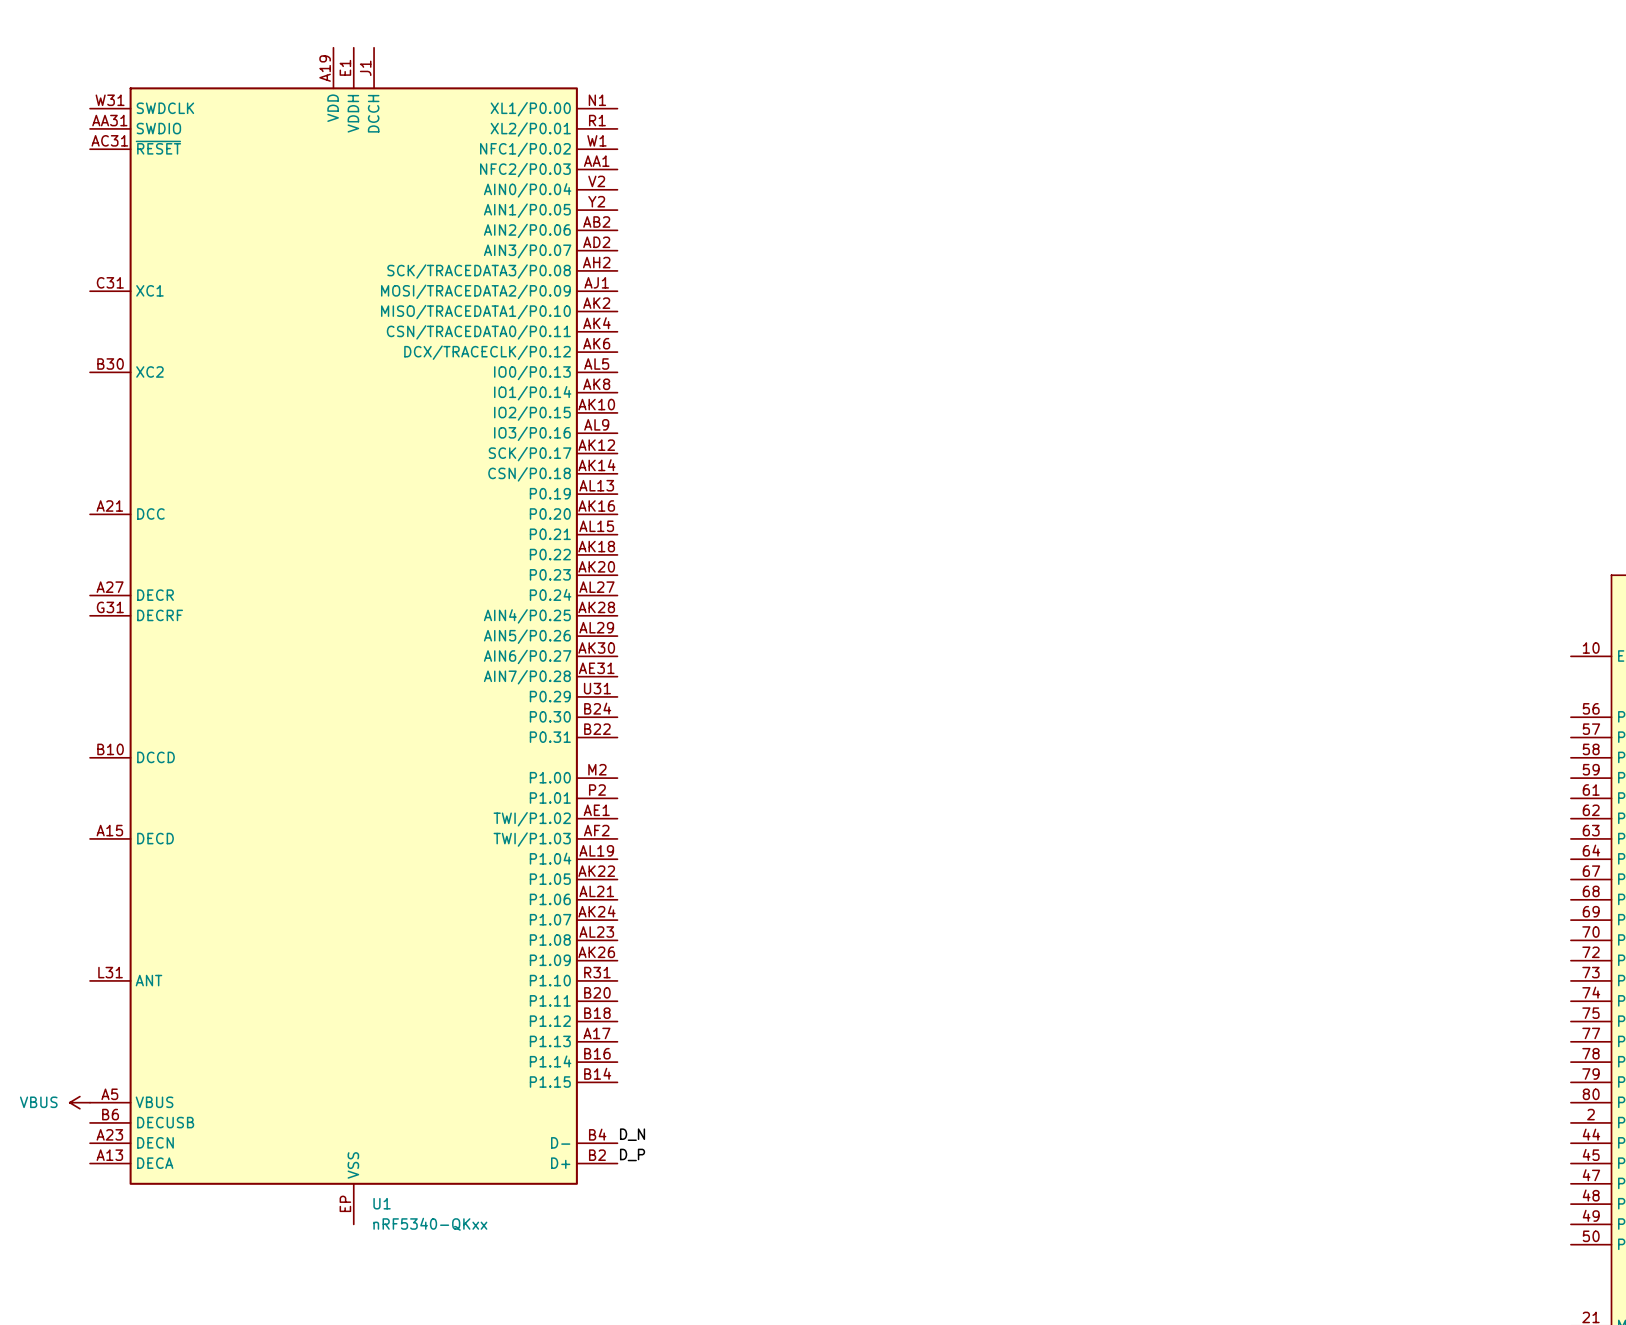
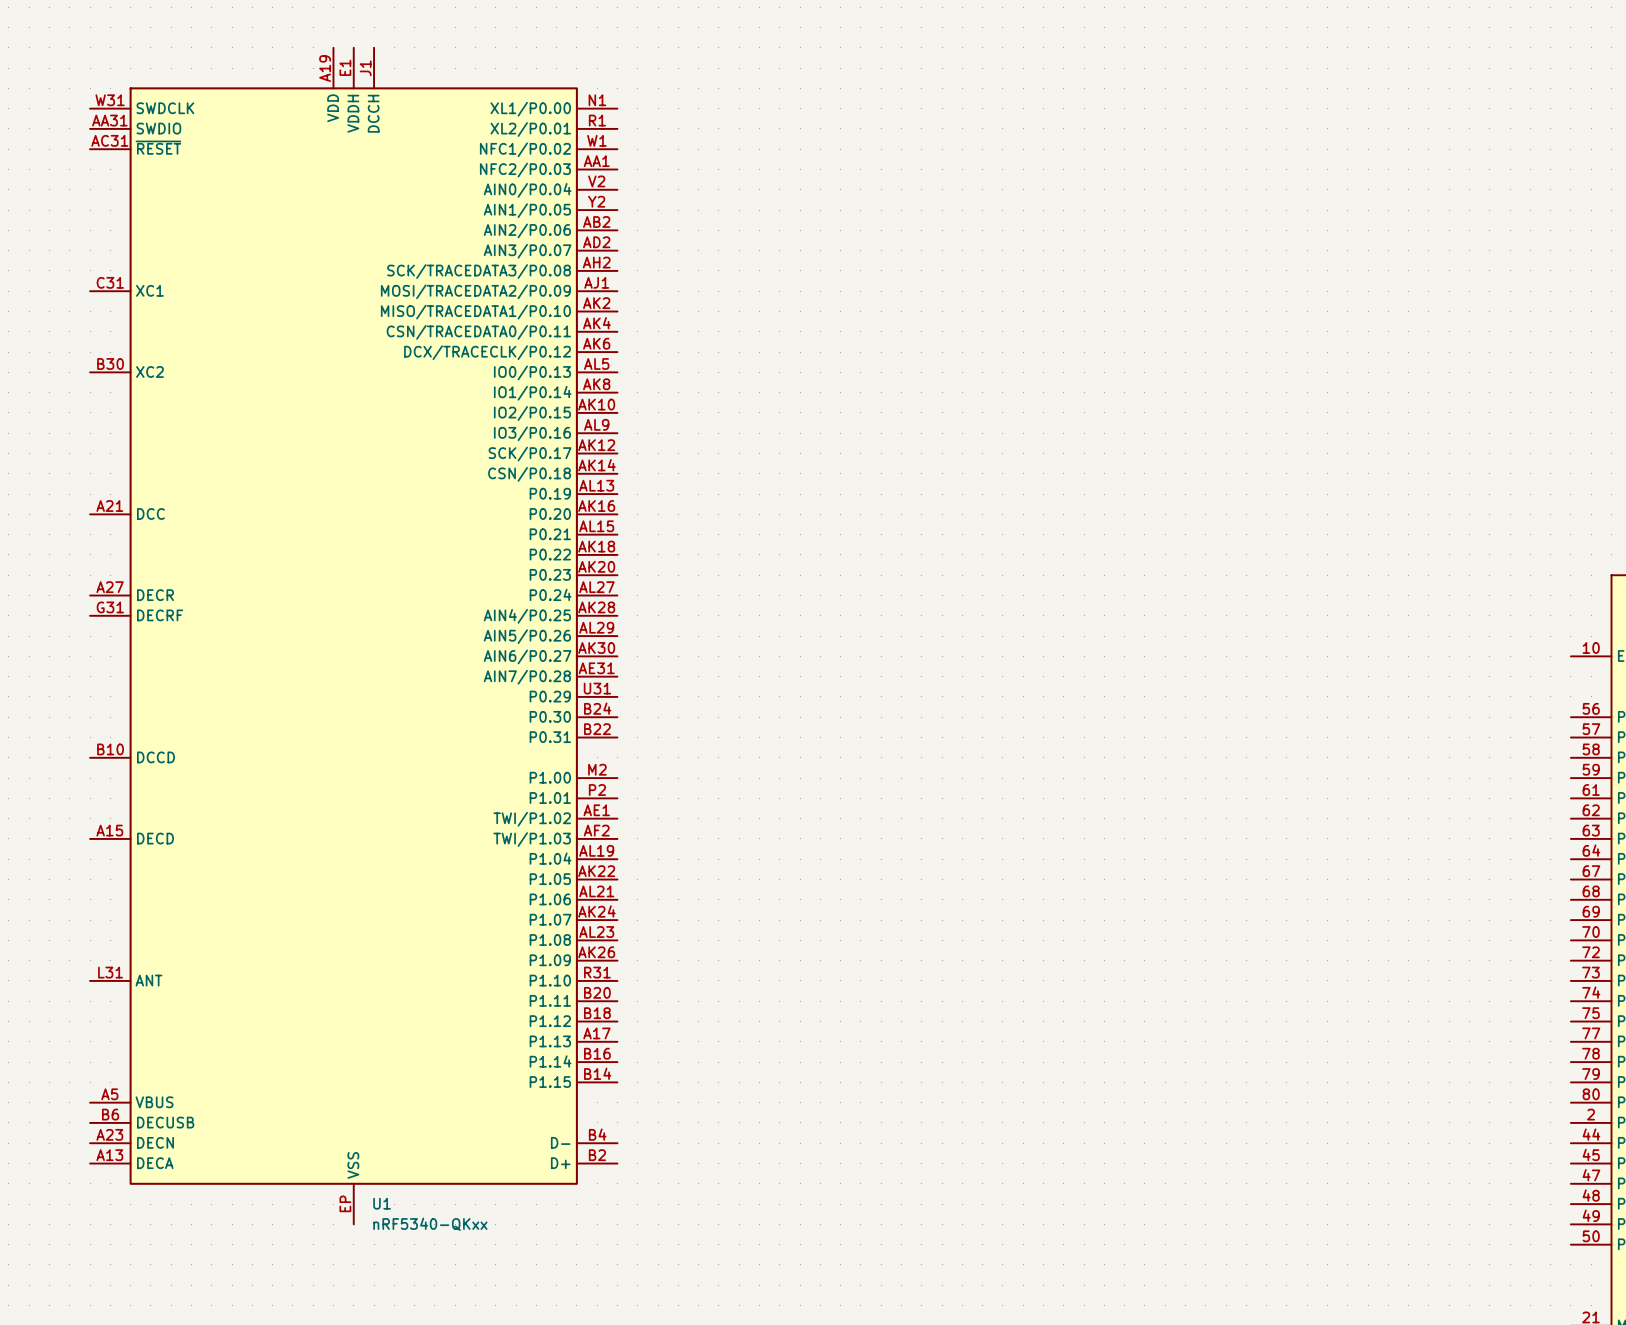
power symbol: VBUS (79, 1102) -> none
label: D_N (632, 1134) -> none
label: D_P (632, 1154) -> none

